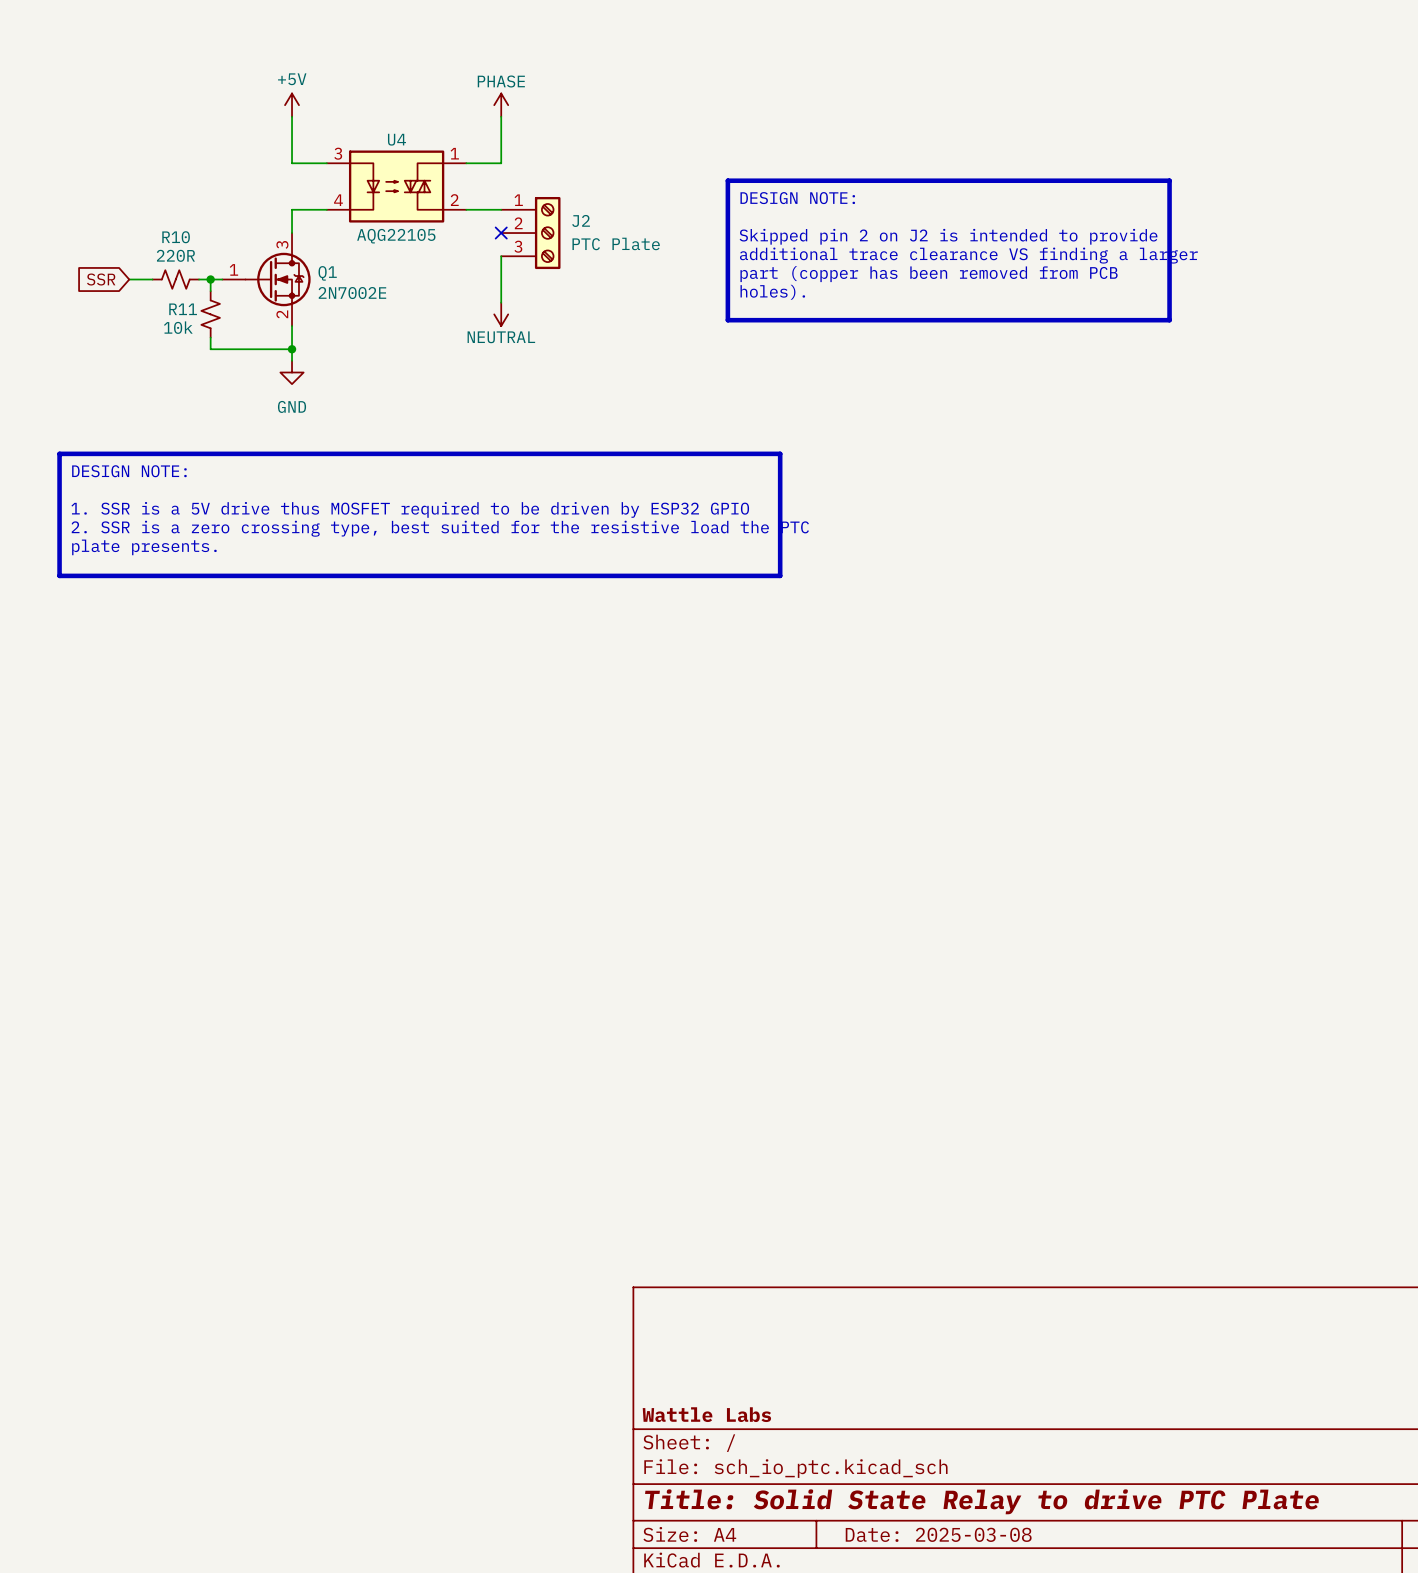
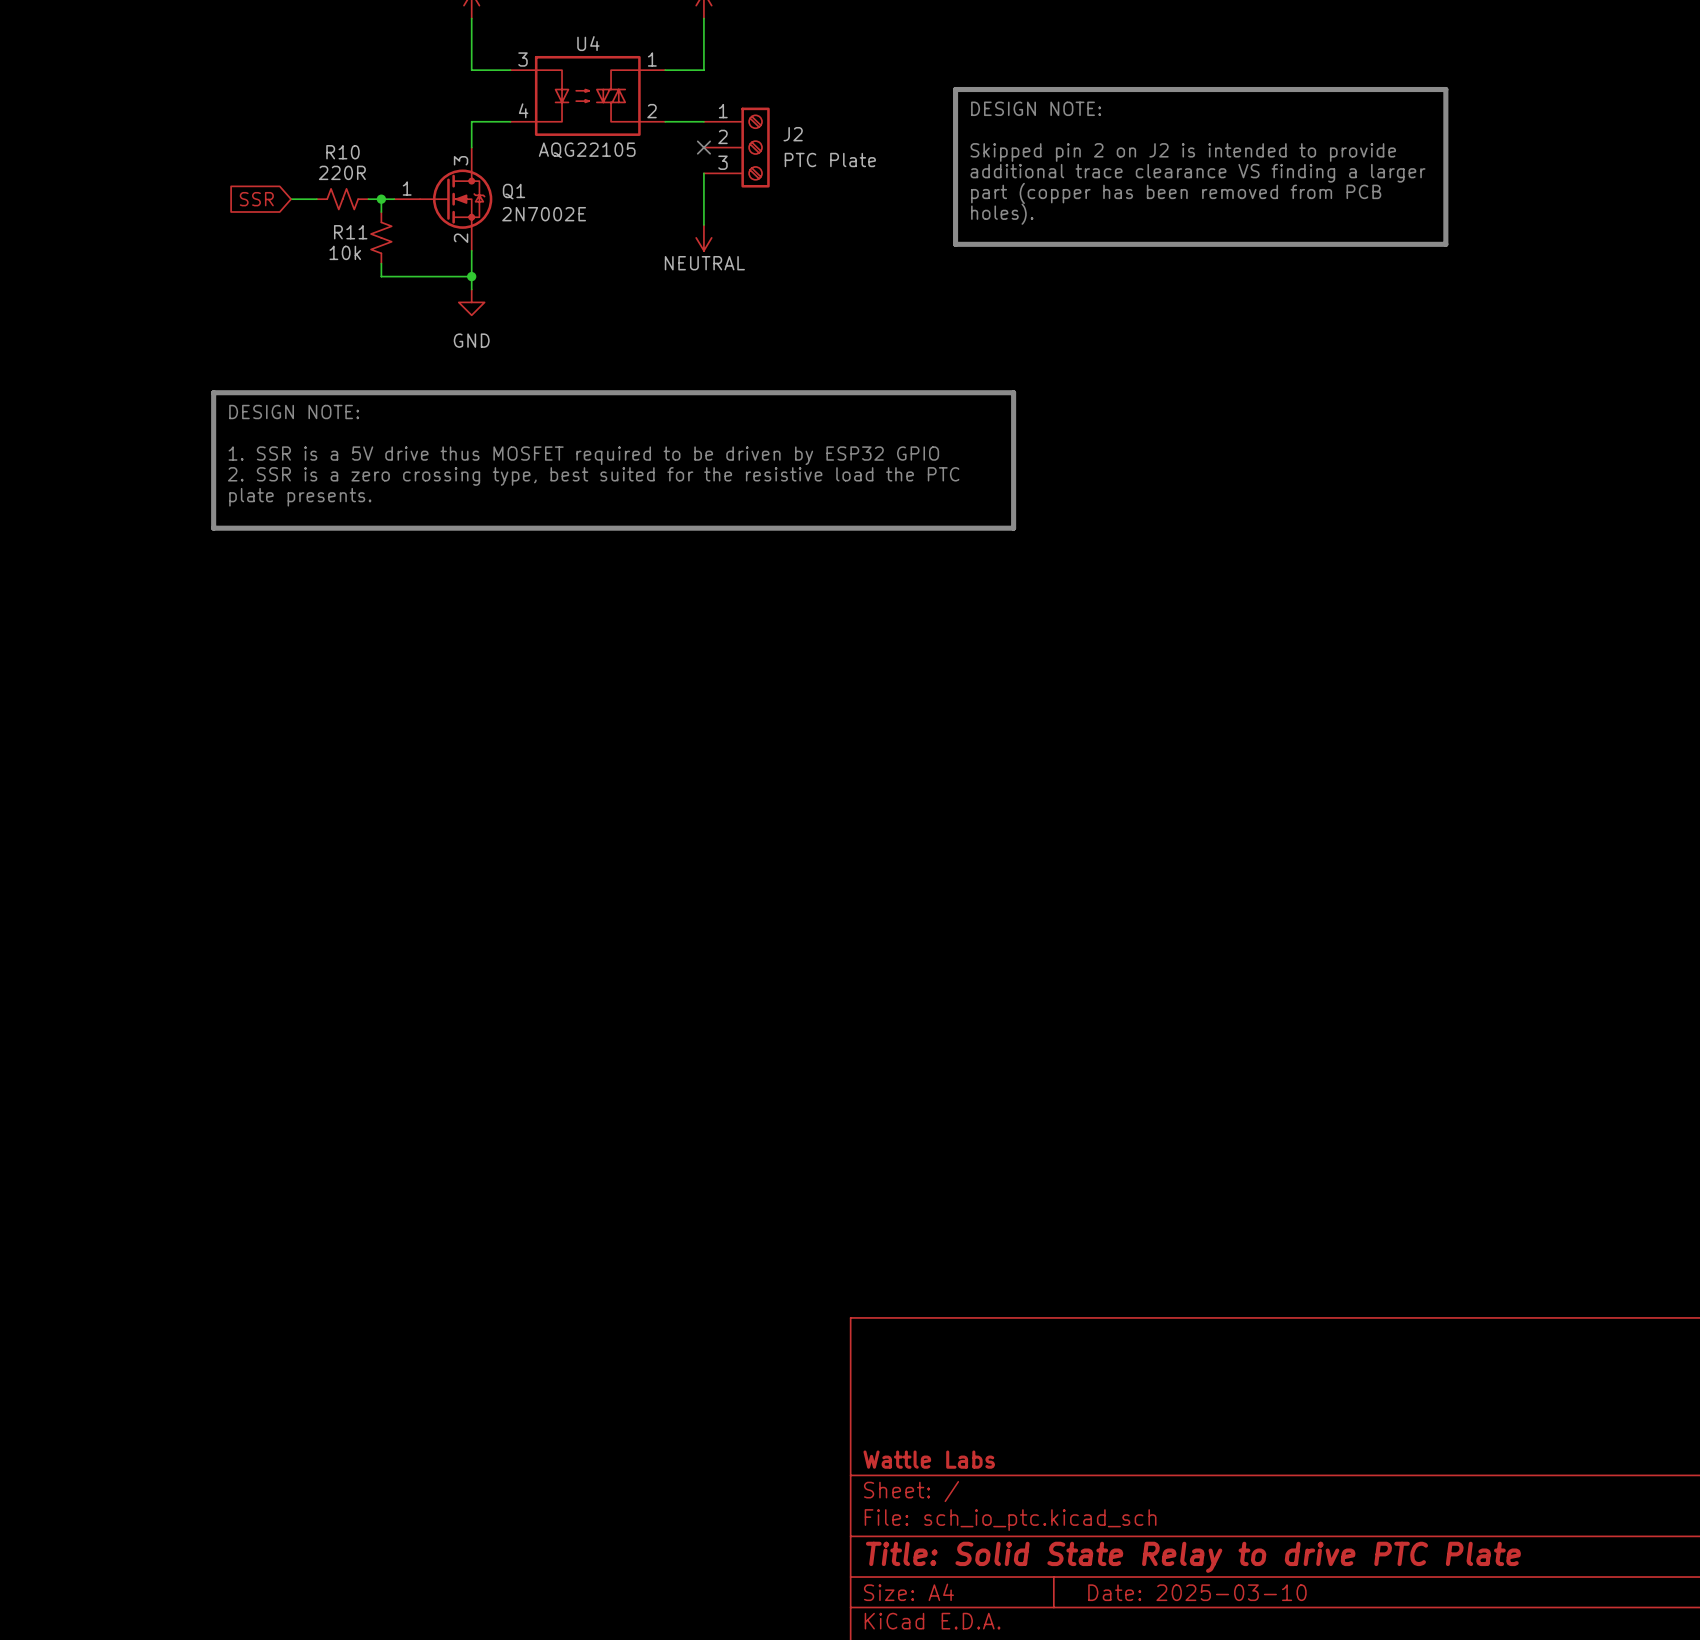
title block: Date: 2025-03-08 (938, 1534) -> Date: 2025-03-10 (1197, 1592)

